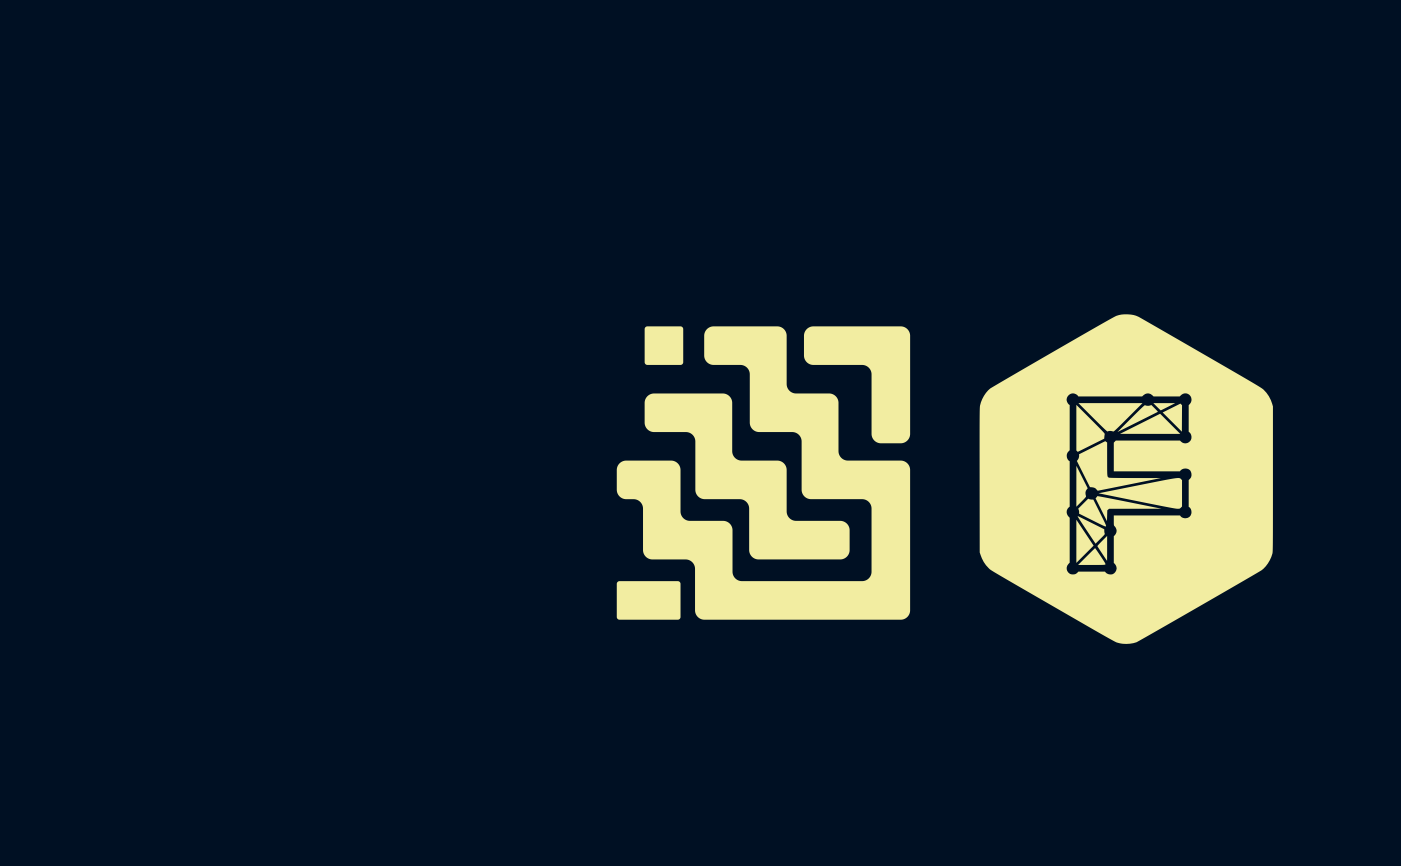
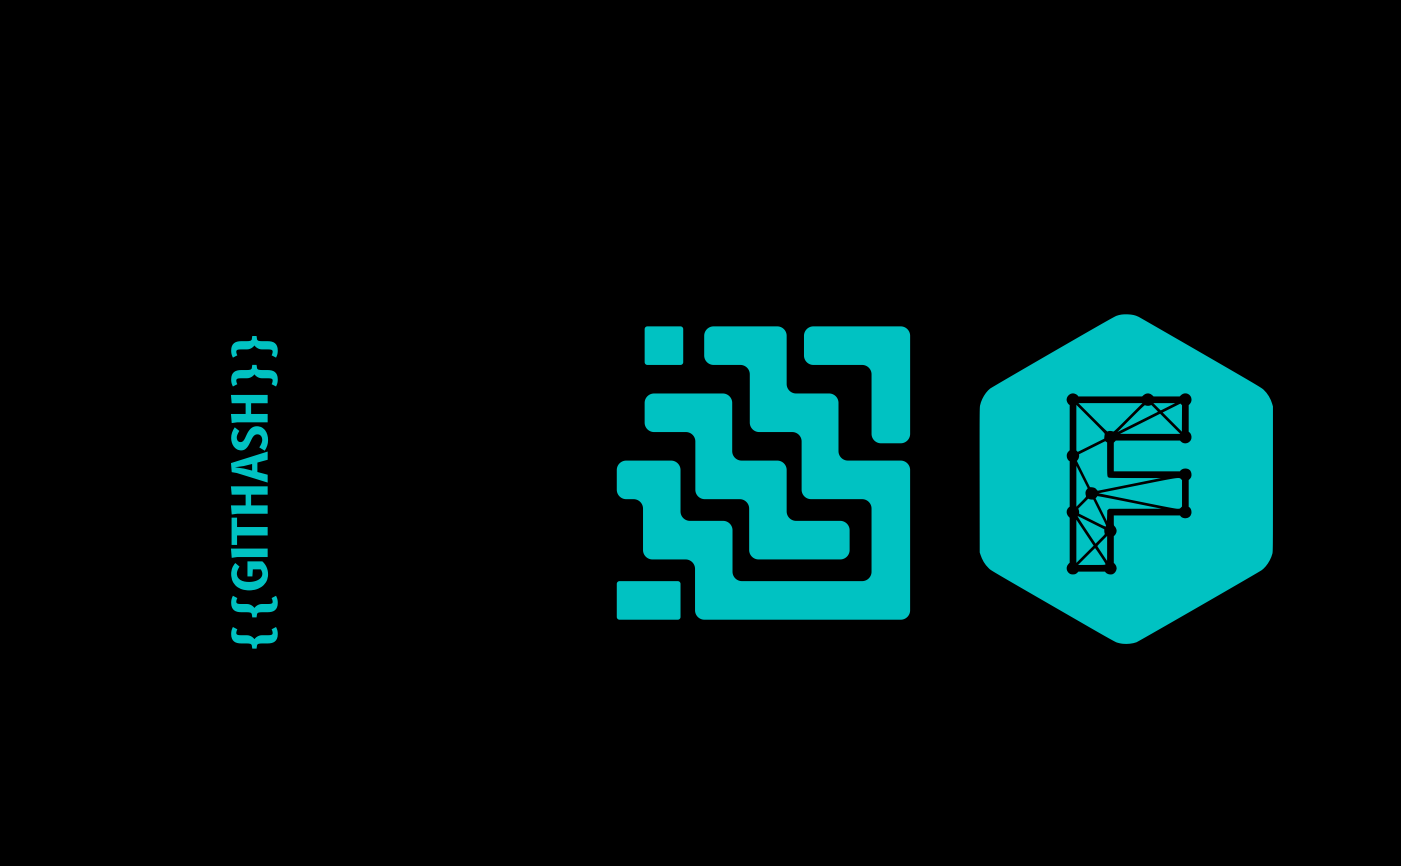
text: none -> {{GITHASH}} (254, 492)

